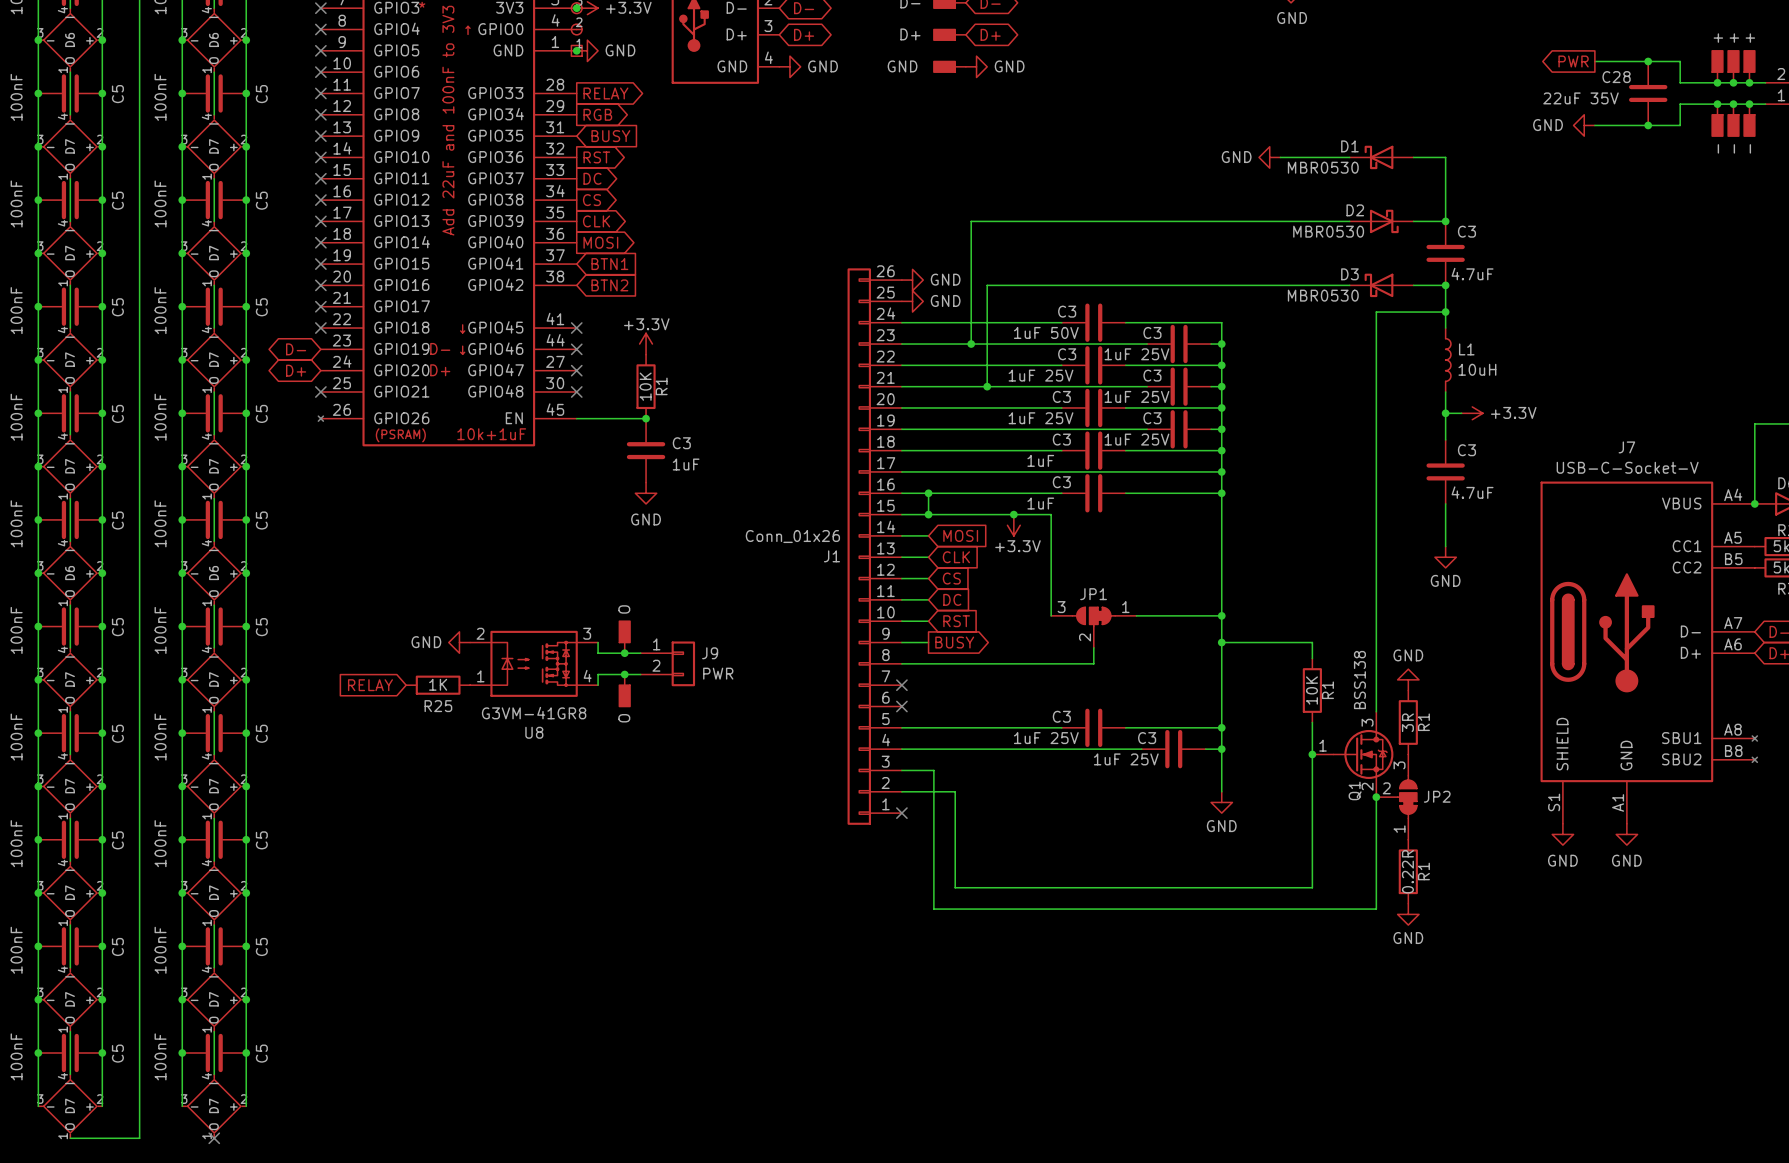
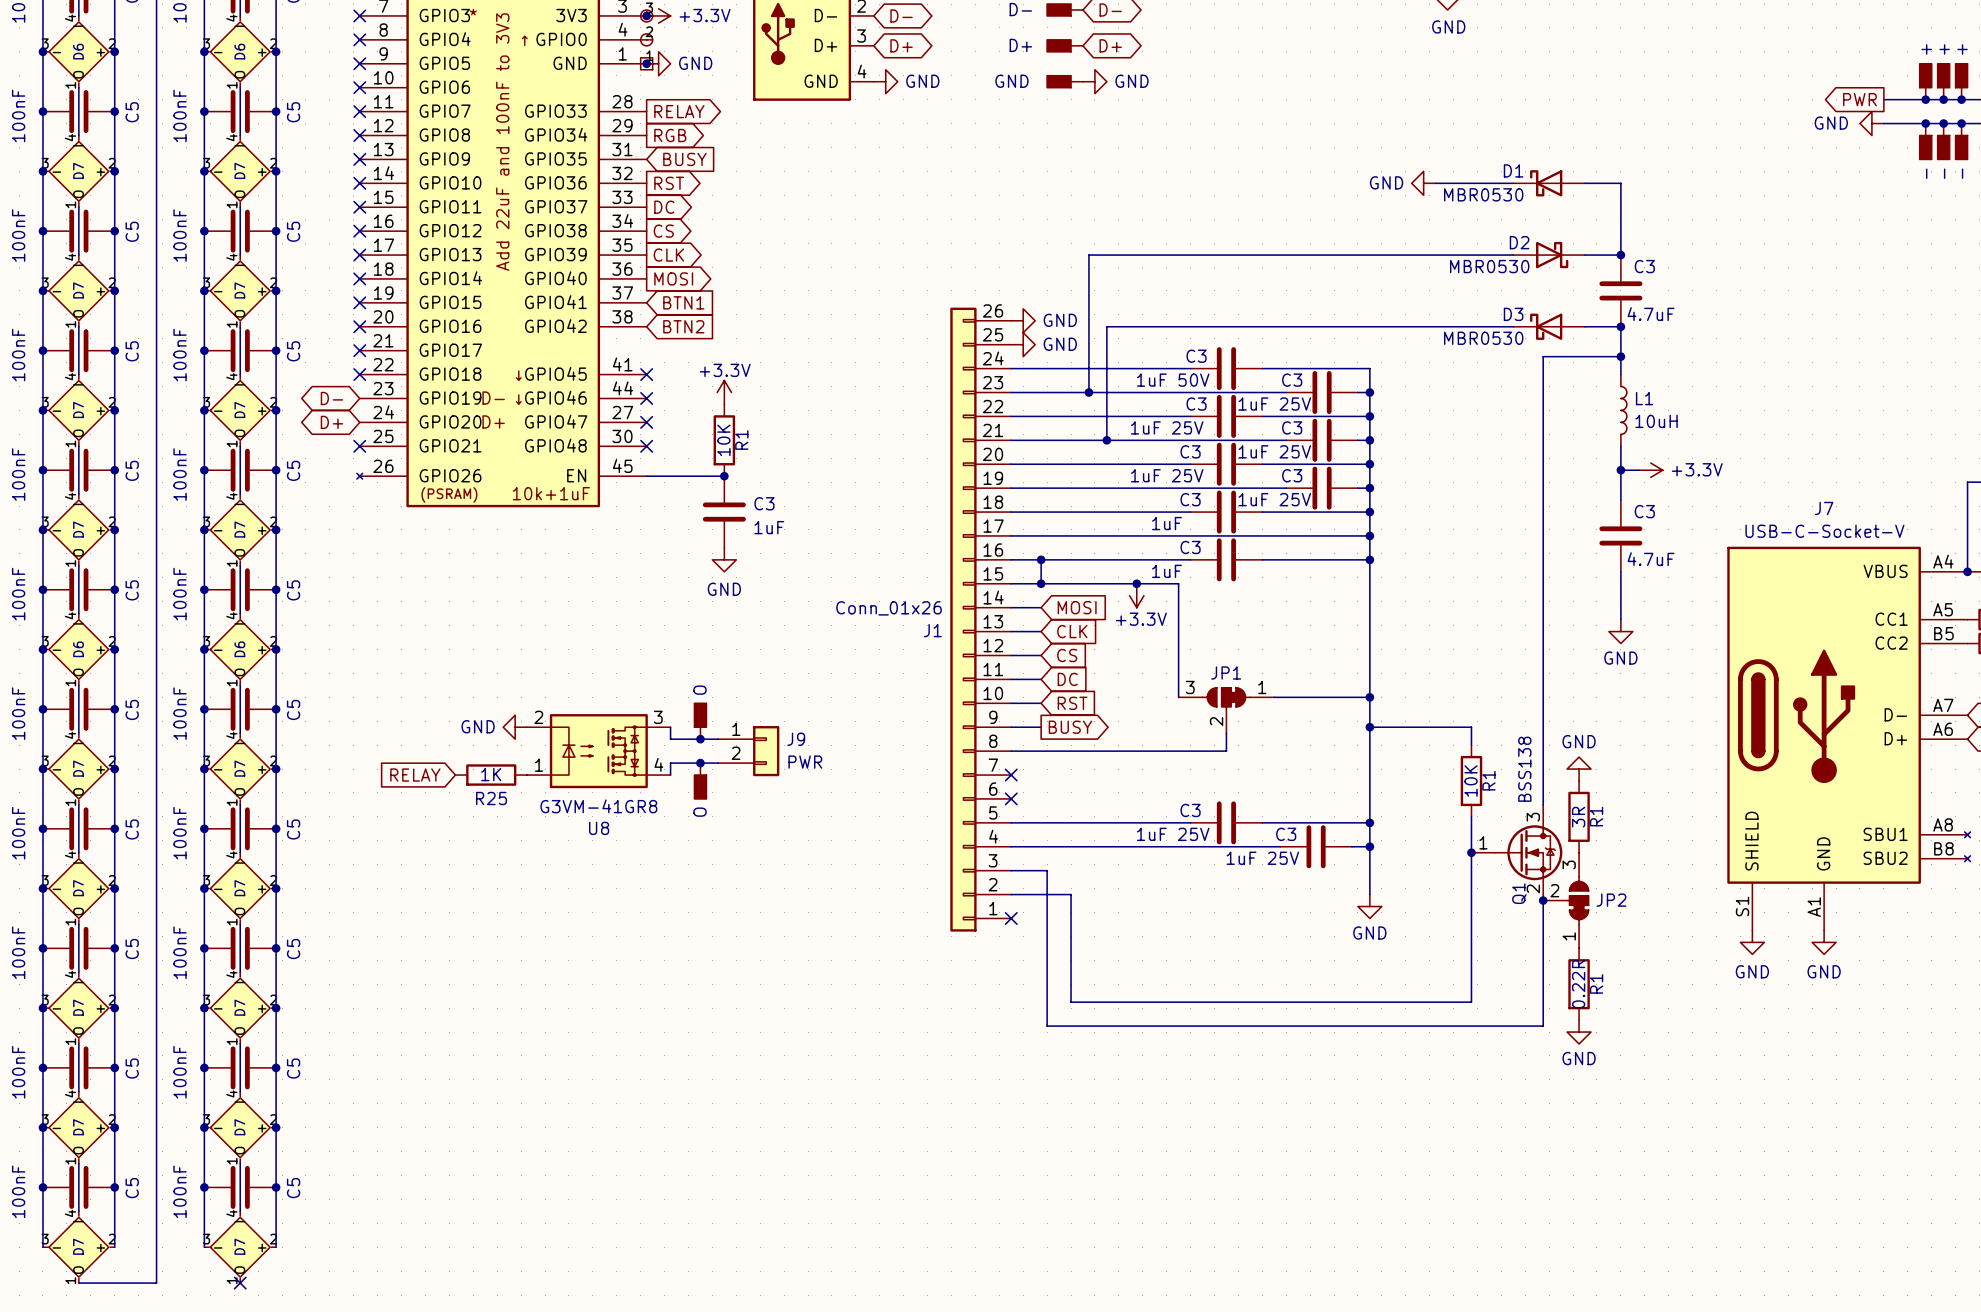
global label position: PWR (1573, 61) -> PWR (1859, 99)
wire: (1594, 61) (1680, 61) (1680, 82) -> none
junction: (1648, 61) -> none
C28: 22uF 35V (1648, 93) -> none
wire: (1680, 104) (1680, 125) (1594, 125) -> none
power symbol position: GND (1584, 125) -> GND (1871, 123)
junction: (1648, 125) -> none

